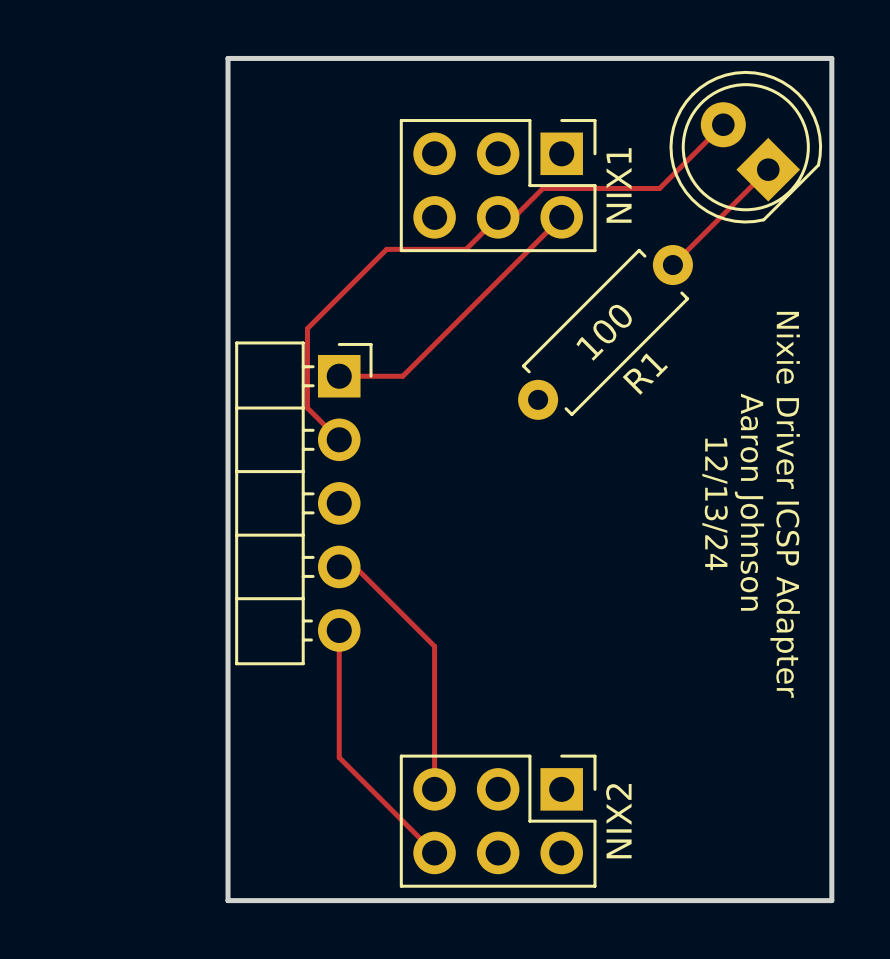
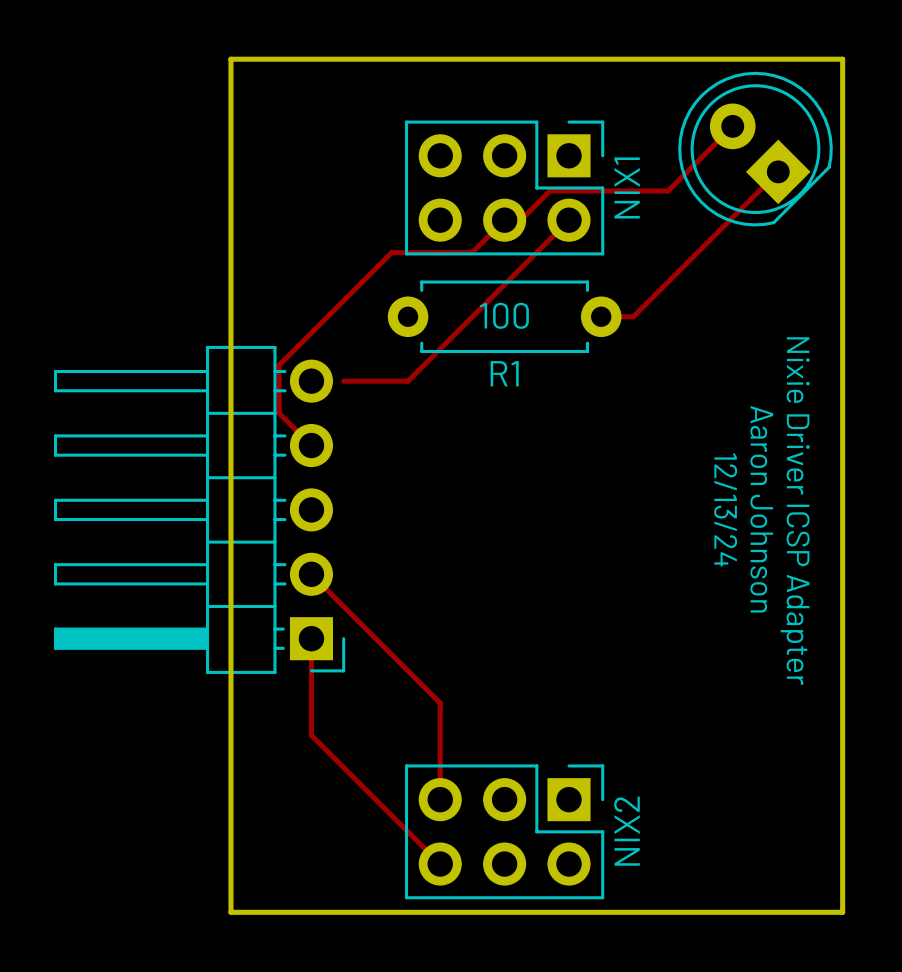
track: none -> (681, 268) (633, 316) (601, 316)
track: (307, 328) (307, 408) (339, 439) -> (311, 332) (279, 365) (279, 413) (311, 445)
R1 rotation: 0° (605, 332) -> 45° clockwise (504, 316)
R1 position: (605, 332) -> (504, 316)
part: none -> (199, 509)
part: (303, 503) -> none
track: (339, 566) (355, 566) (434, 646) (434, 694) -> (311, 574) (440, 703)
track: (339, 630) (339, 757) -> (311, 638) (311, 735) (343, 767)

